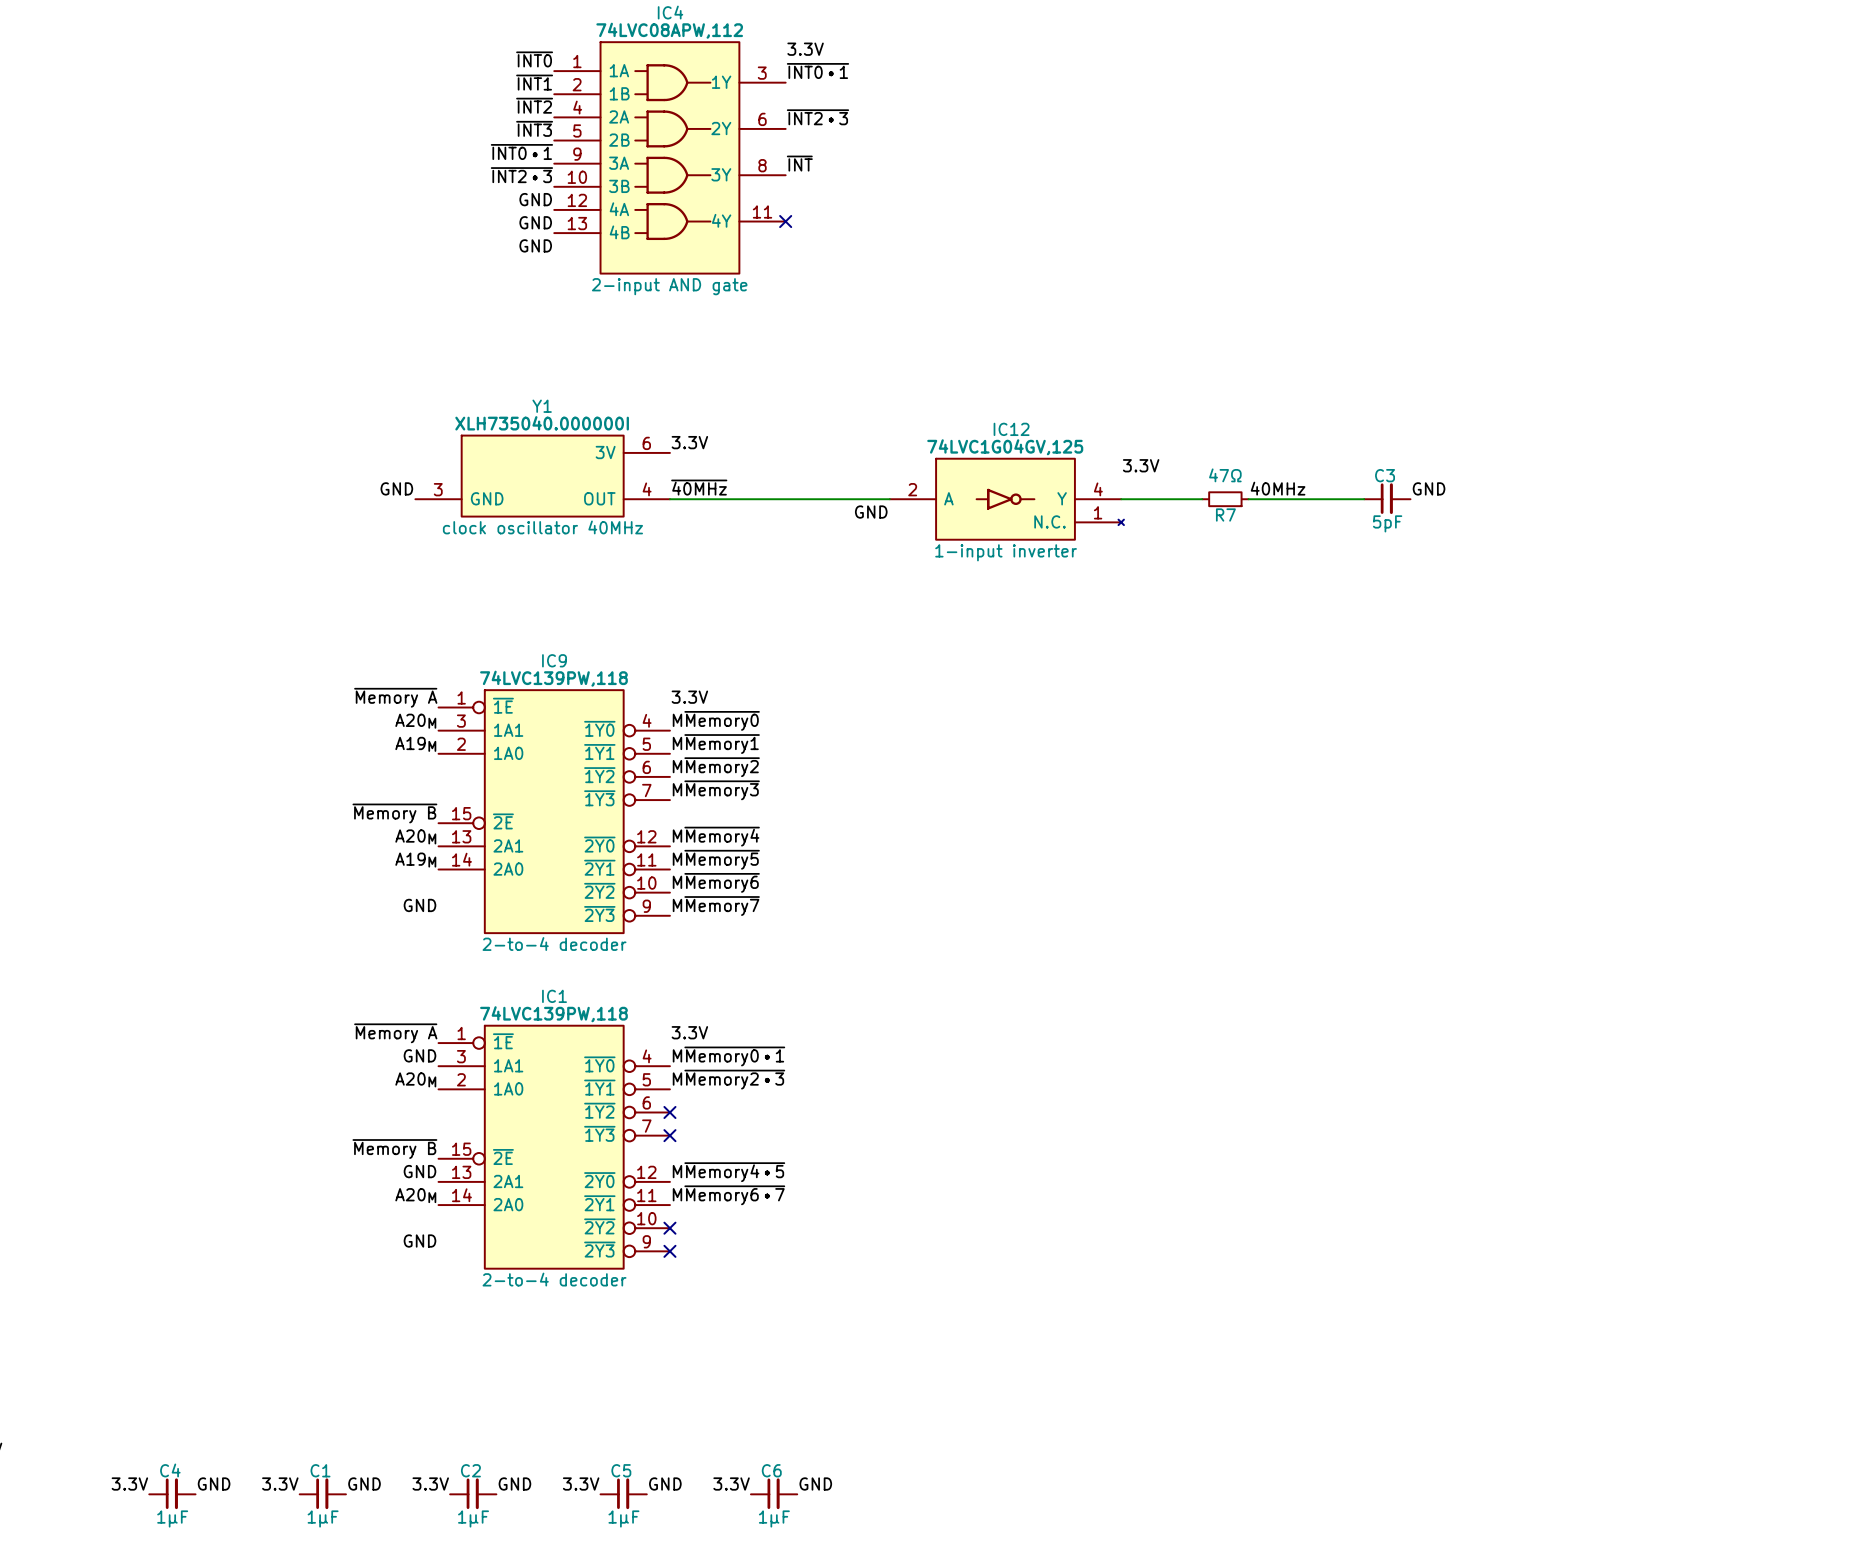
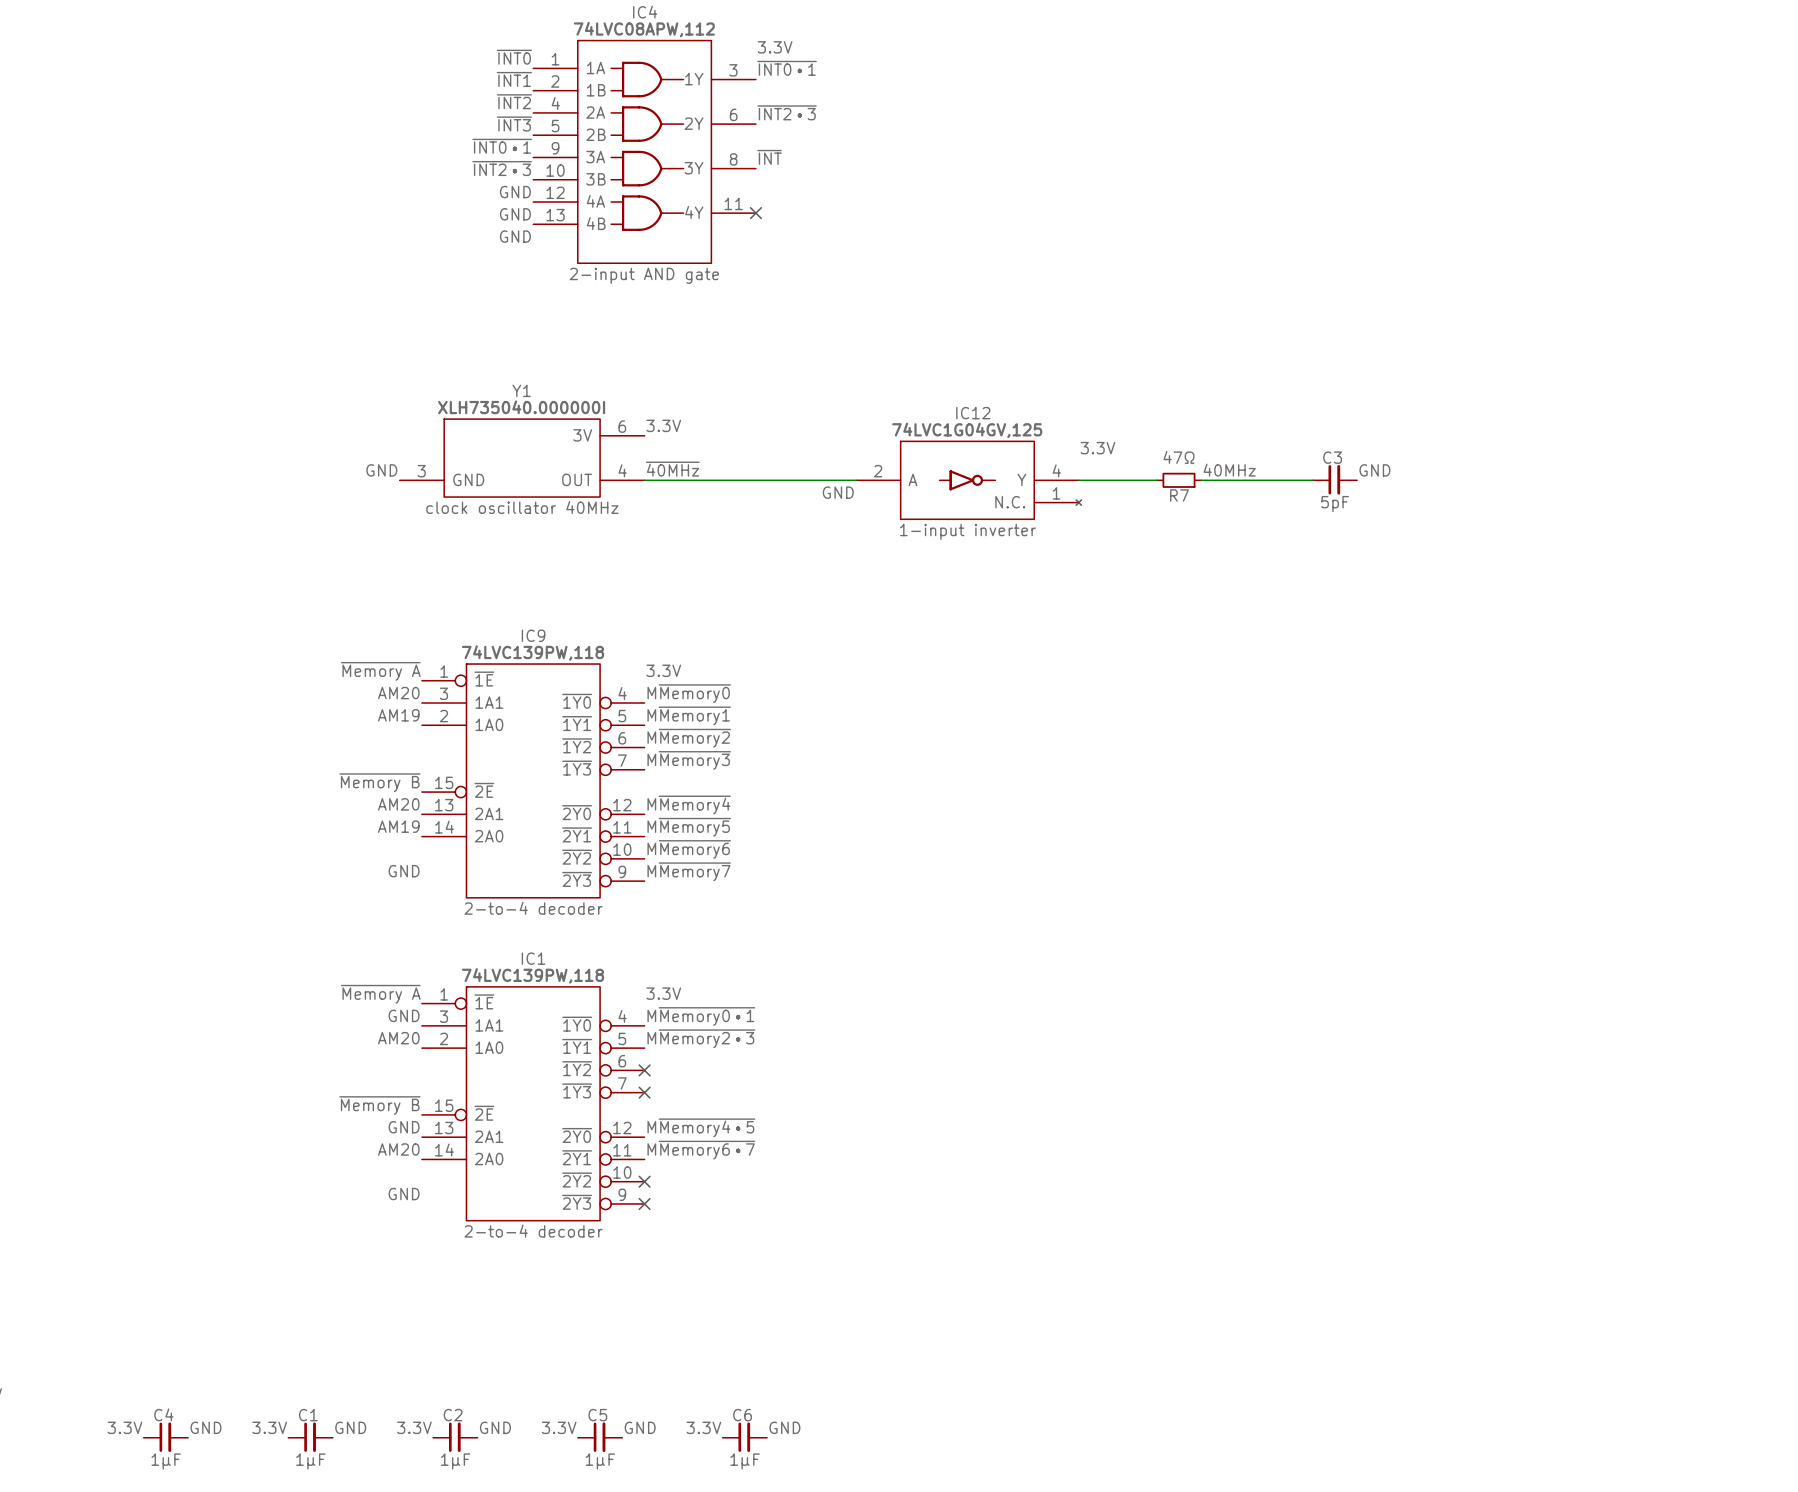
label: A20M (415, 721) -> AM20 (398, 693)
label: A19M (415, 744) -> AM19 (398, 715)
label: A20M (415, 836) -> AM20 (398, 804)
label: A19M (415, 860) -> AM19 (398, 826)
label: A20M (415, 1079) -> AM20 (398, 1038)
label: A20M (415, 1195) -> AM20 (398, 1149)

